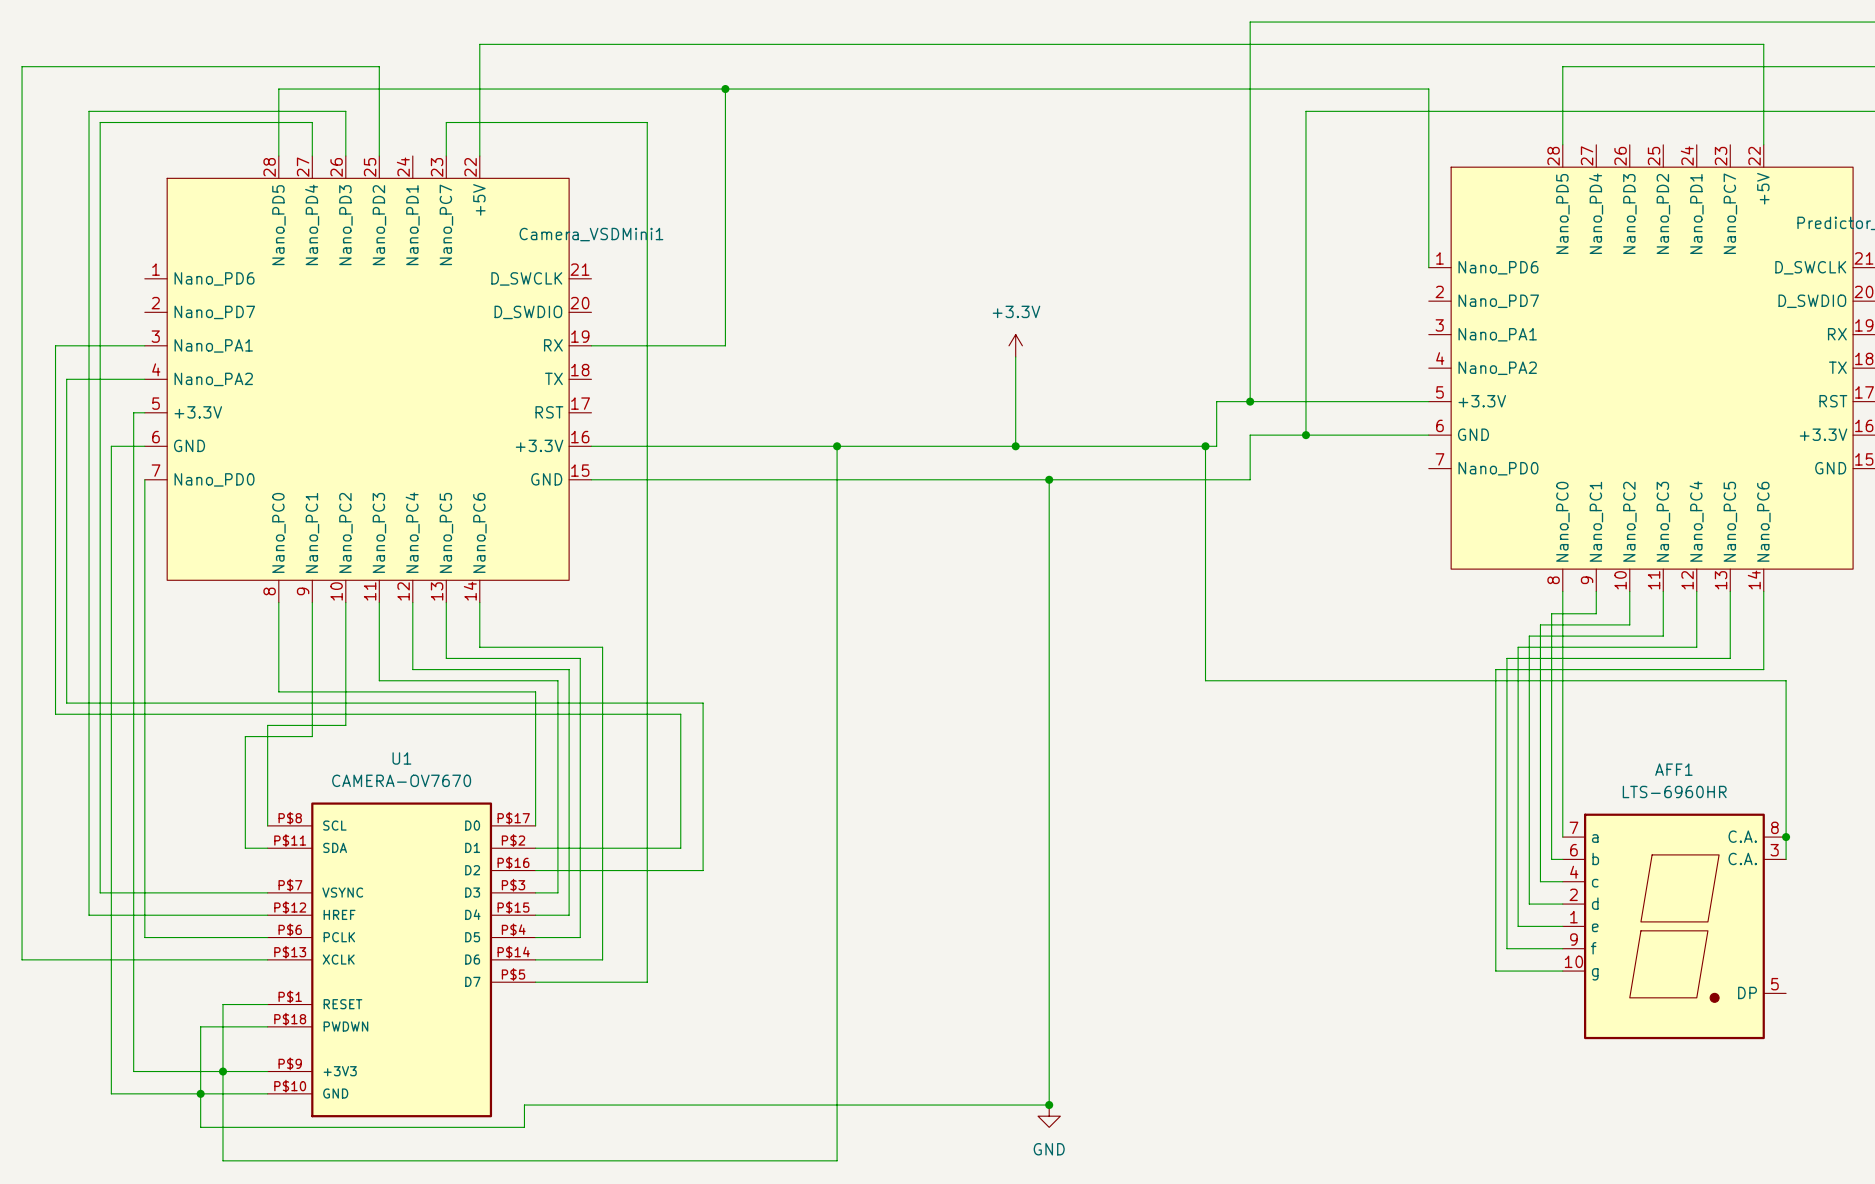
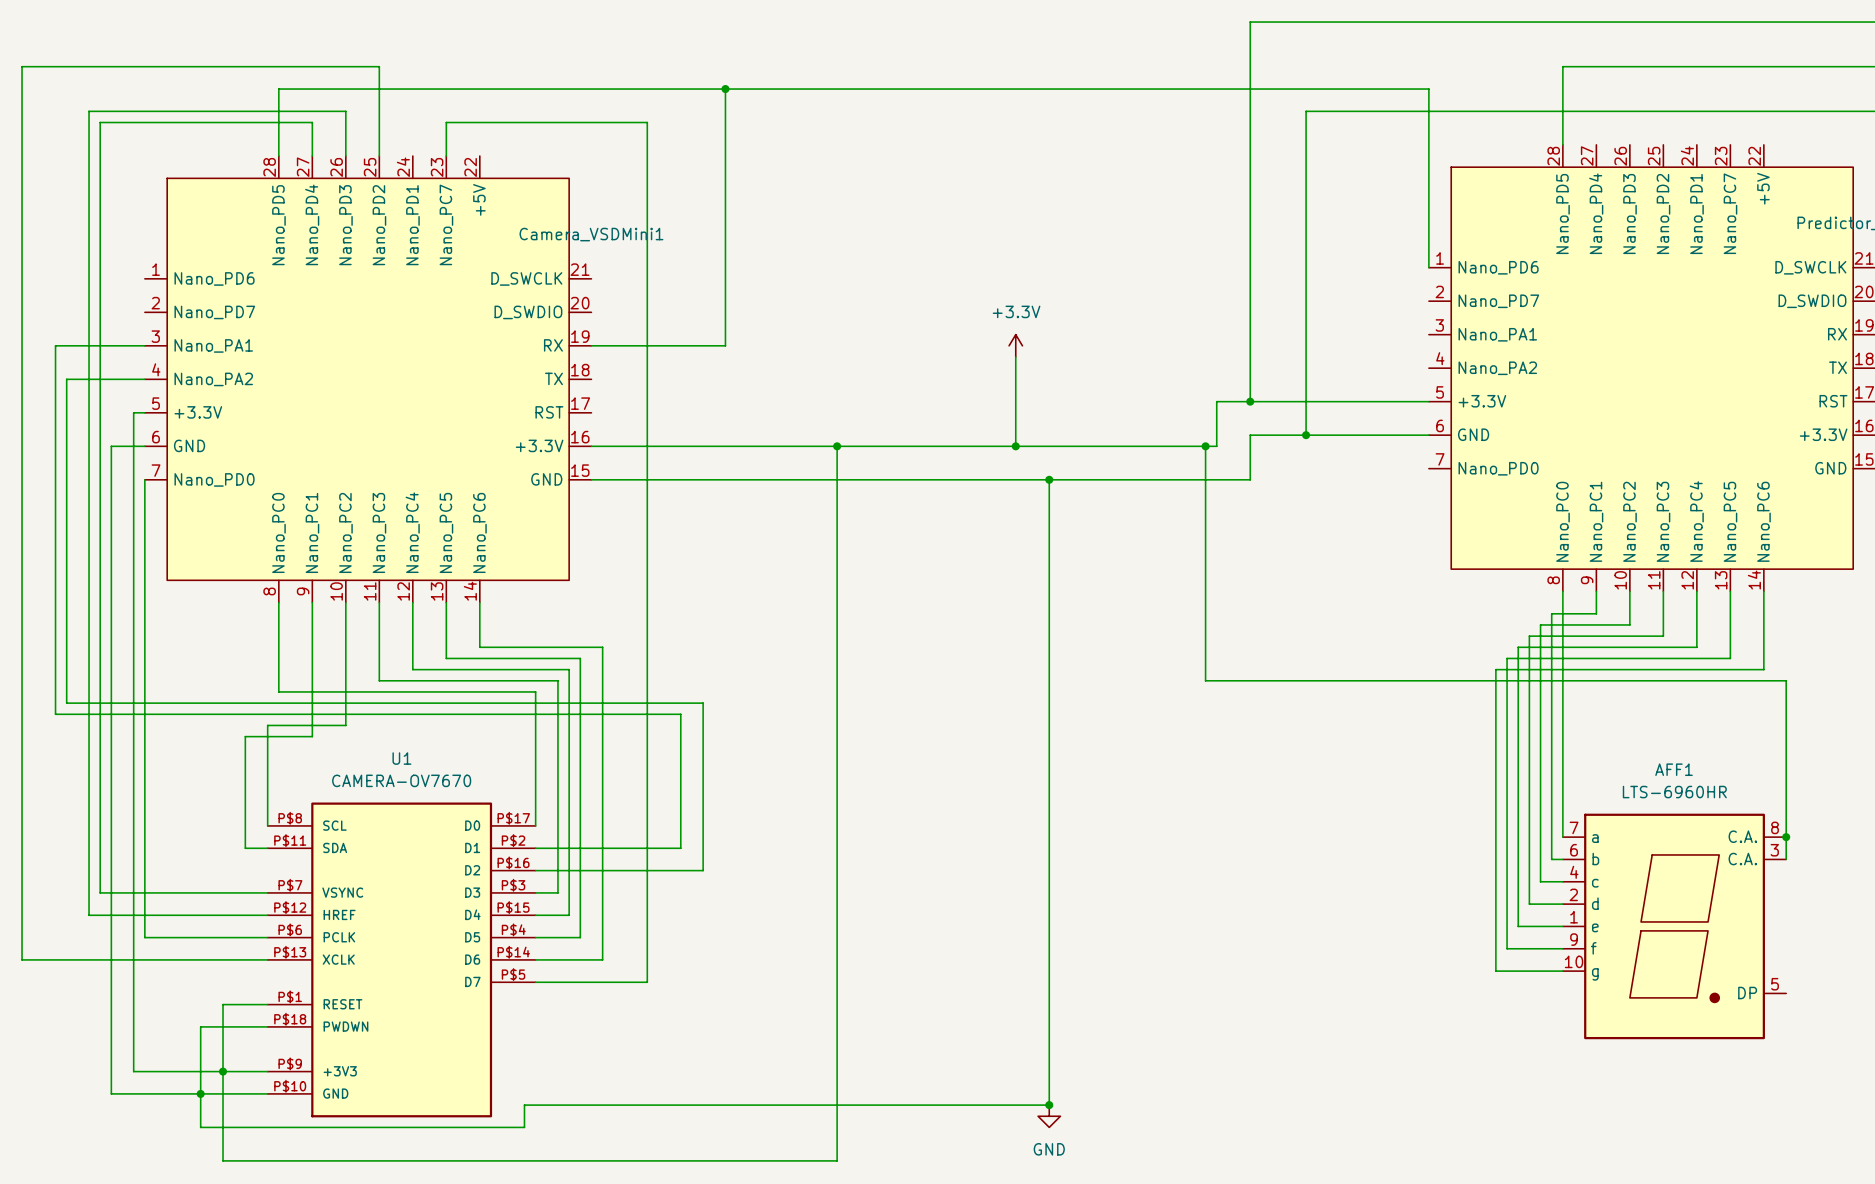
wire: (1763, 144) (1763, 44) (479, 44) (479, 156) -> none

